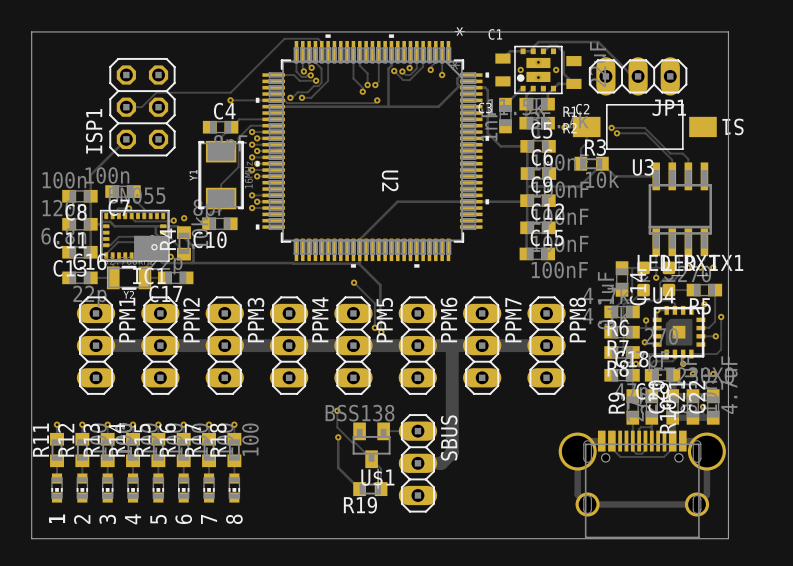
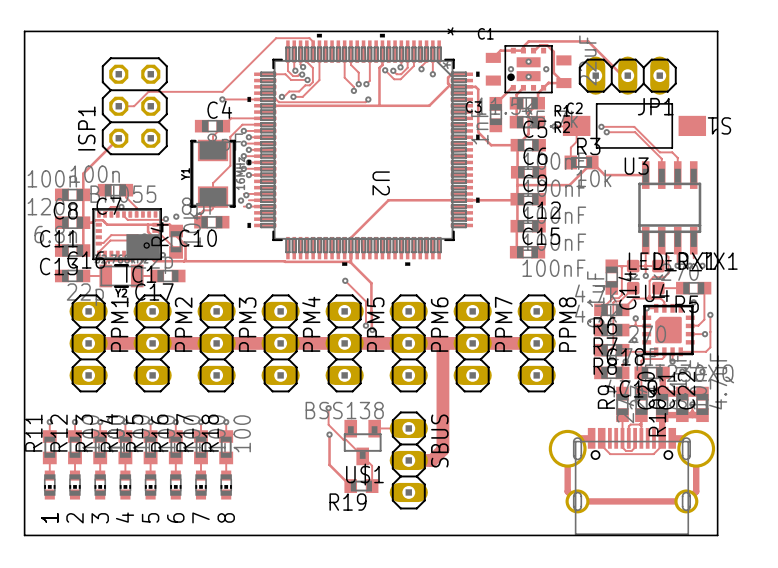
via: (252, 195) -> none
via: none -> (246, 195)
via: (257, 201) -> none
via: none -> (241, 200)
via: none -> (248, 205)
via: (252, 208) -> none

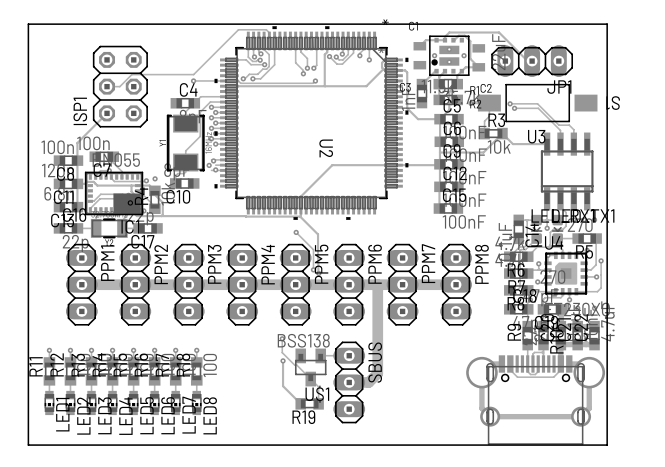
LED1 name: none -> LED1 (62, 414)
LED2 name: none -> LED2 (83, 415)
LED3 name: none -> LED3 (104, 415)
LED4 name: none -> LED4 (125, 416)
LED5 name: none -> LED5 (147, 415)
LED6 name: none -> LED6 (168, 415)
LED7 name: none -> LED7 (189, 415)
LED8 name: none -> LED8 (210, 415)
text: 1 (49, 517) -> none
text: 4 (125, 517) -> none
text: 5 (150, 517) -> none
text: 6 (175, 517) -> none
text: 7 (201, 517) -> none
text: 8 (226, 517) -> none
text: 2 (75, 518) -> none
text: 3 (100, 518) -> none

